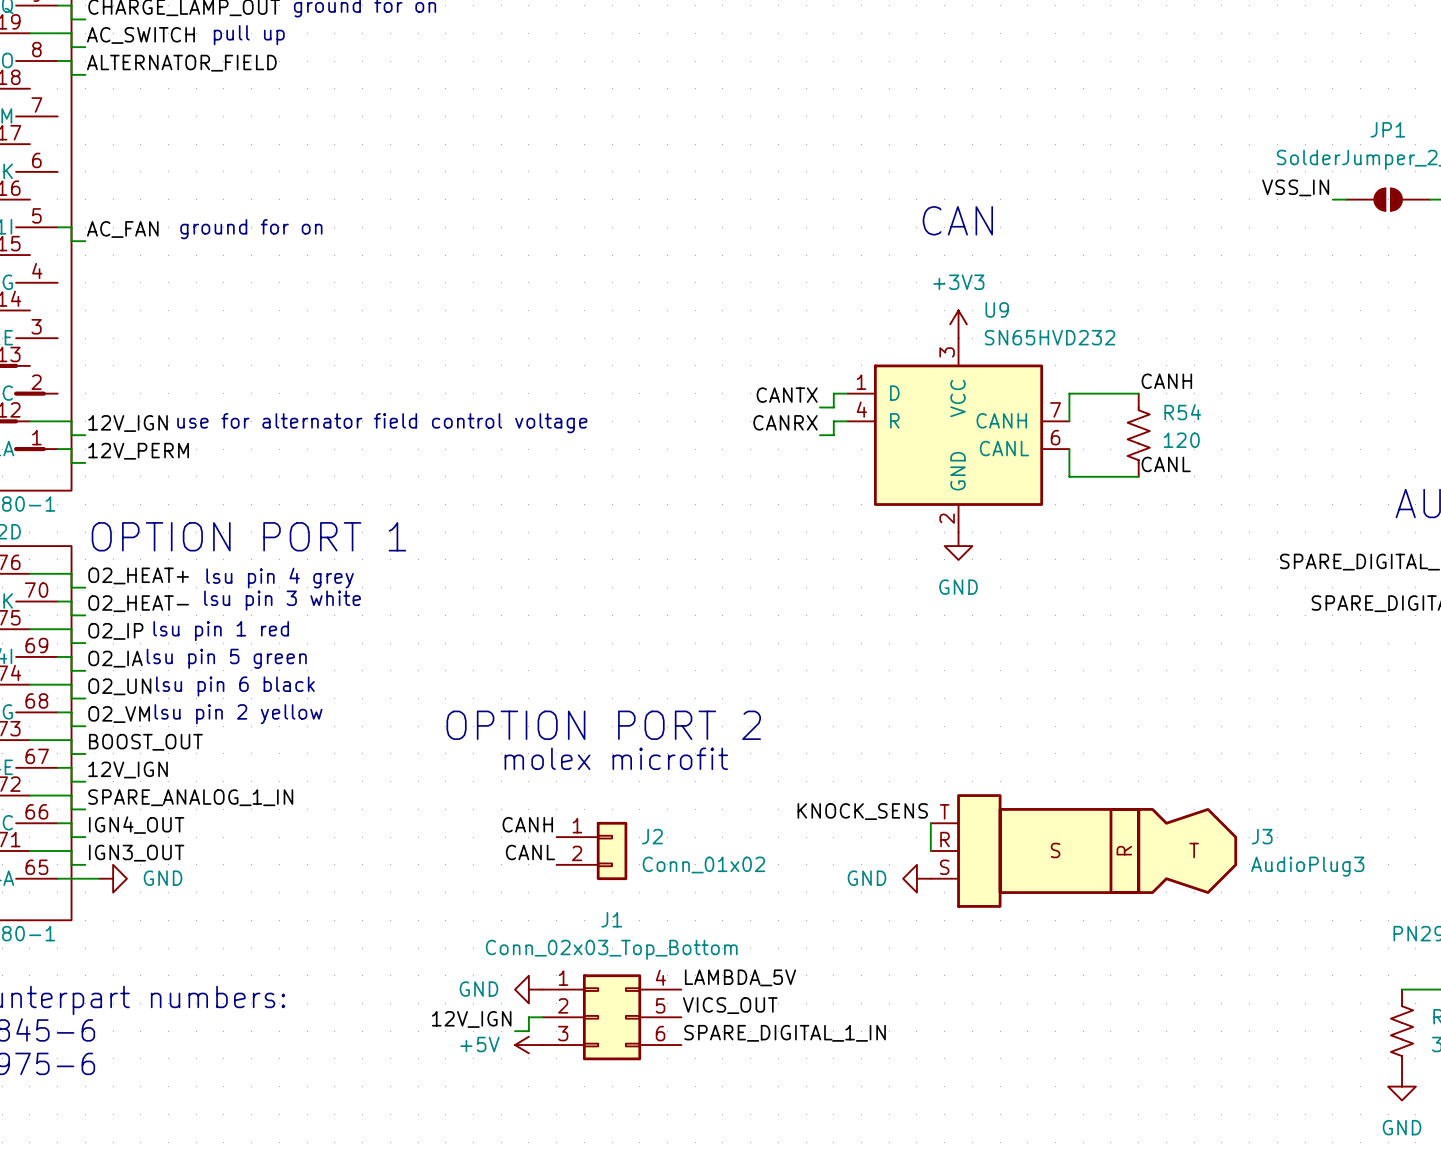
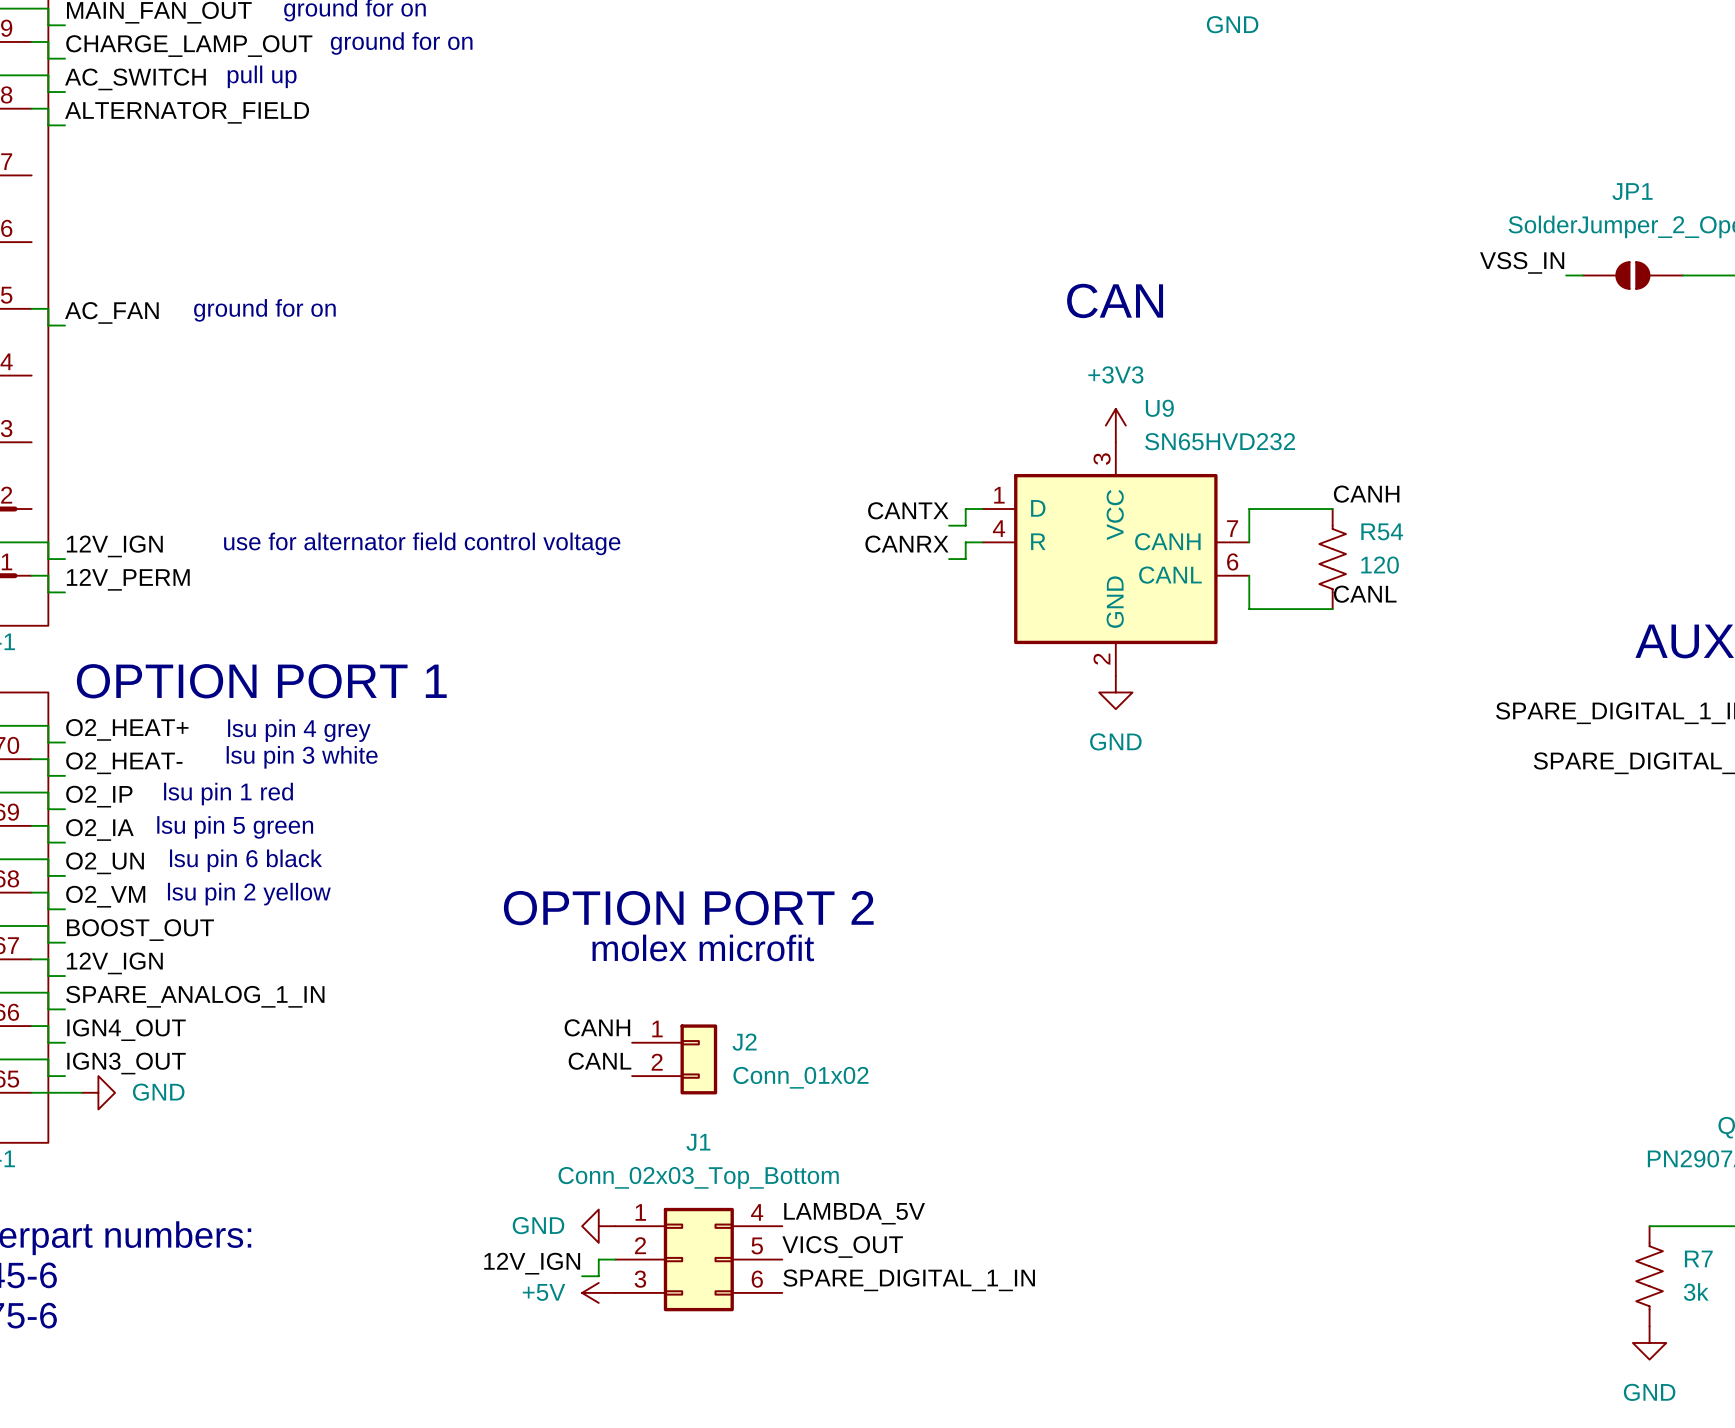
label: KNOCK_SENS (862, 811) -> none
wire: (930, 823) (930, 850) -> none
J3: AudioPlug3 (1083, 850) -> none
power symbol: GND (916, 878) -> none

